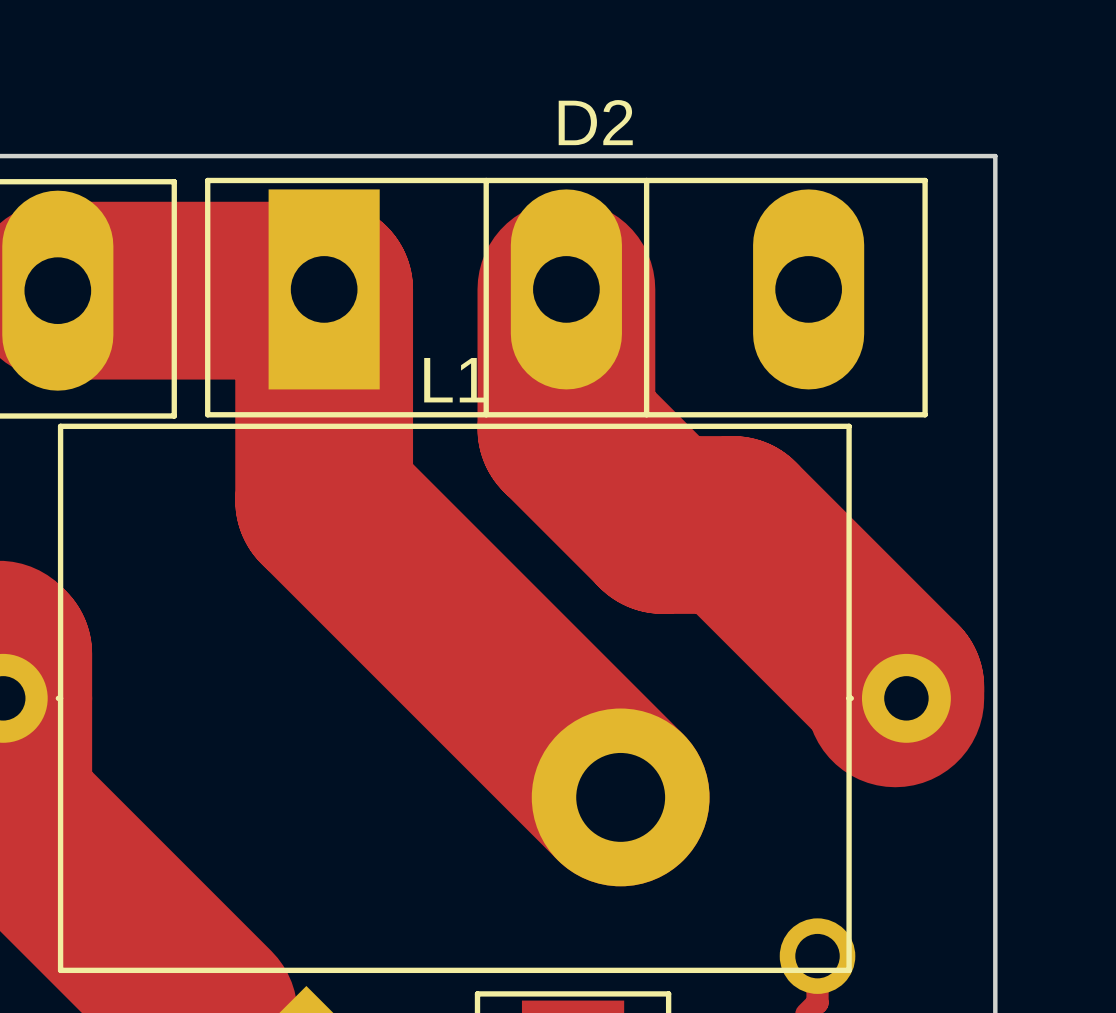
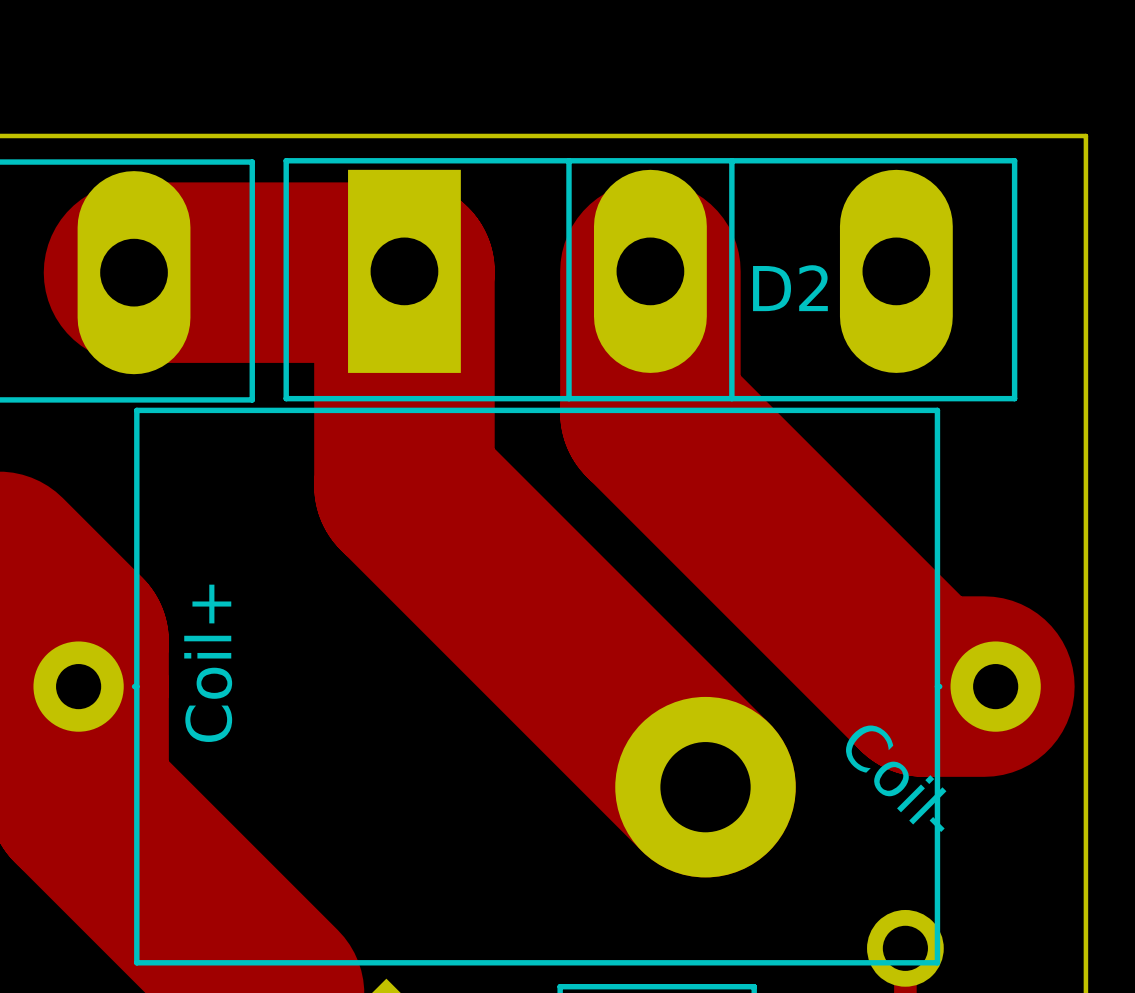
D2 name position: D2 (595, 122) -> D2 (790, 288)
L1 name: L1 (455, 380) -> none
track: (662, 524) (733, 524) (895, 687) (895, 698) -> (748, 510) (924, 686) (984, 686)
text: none -> Coil+ (208, 663)
text: none -> Coil- (896, 778)

